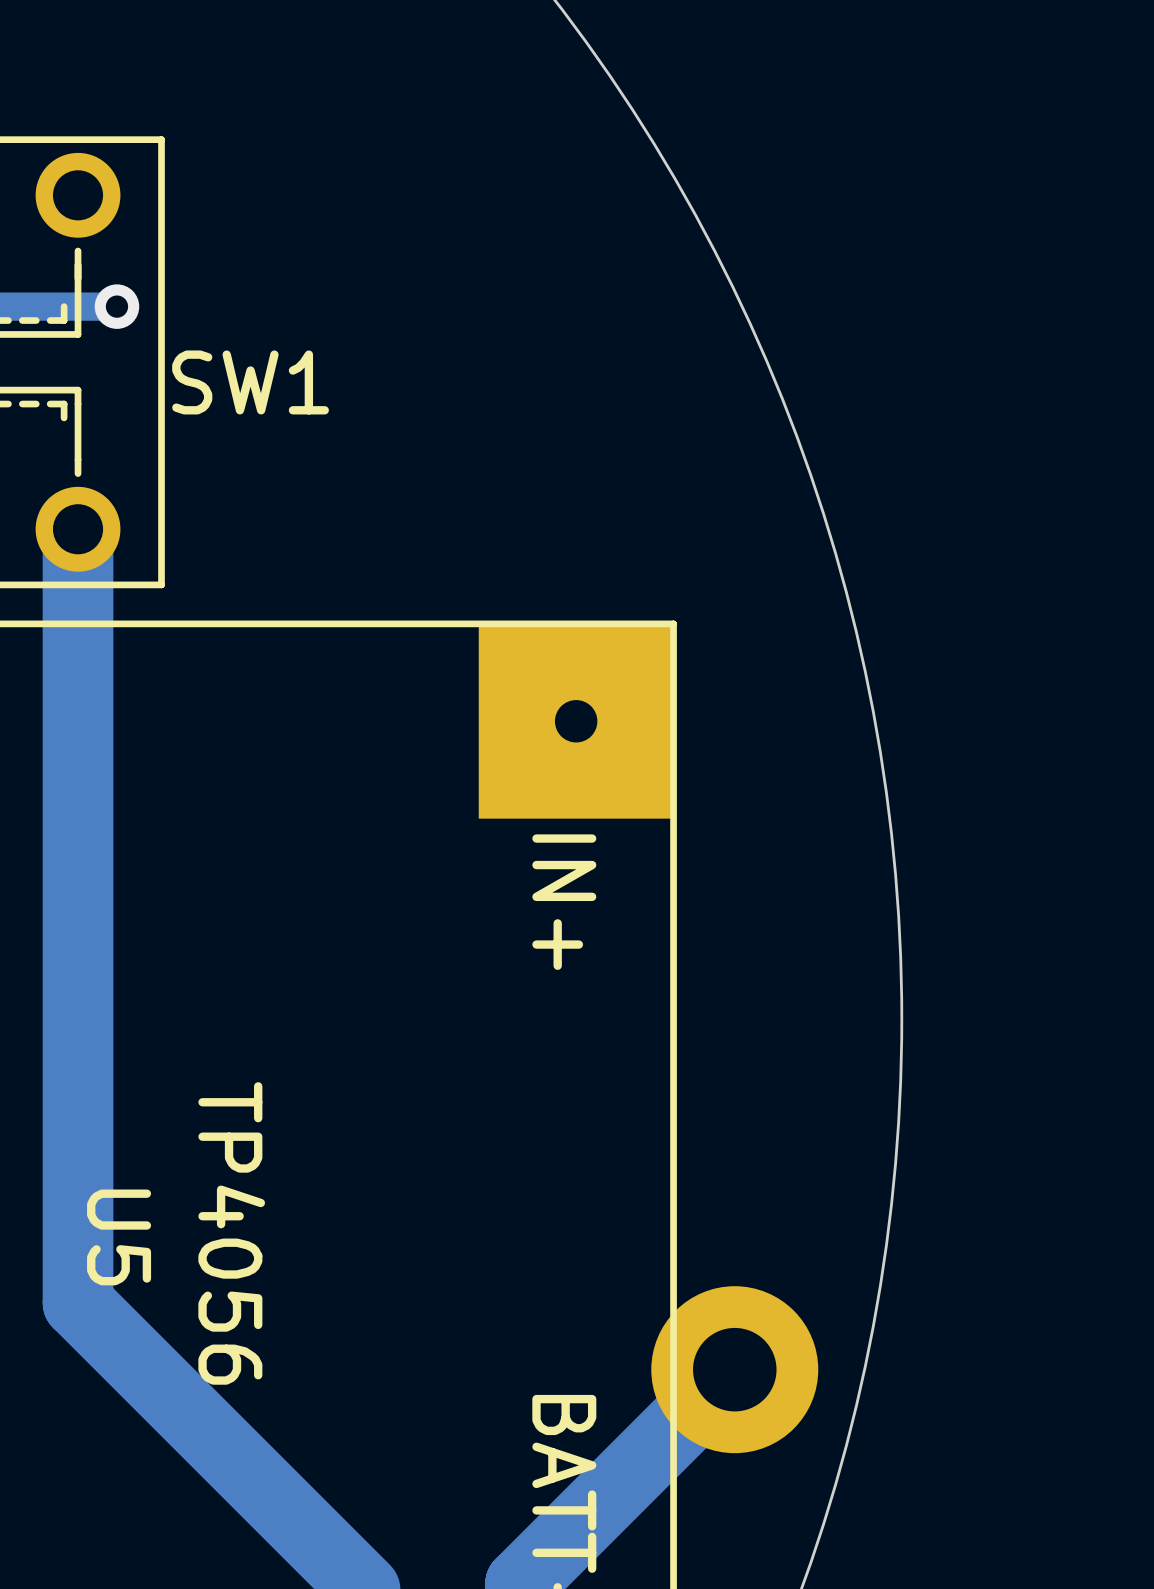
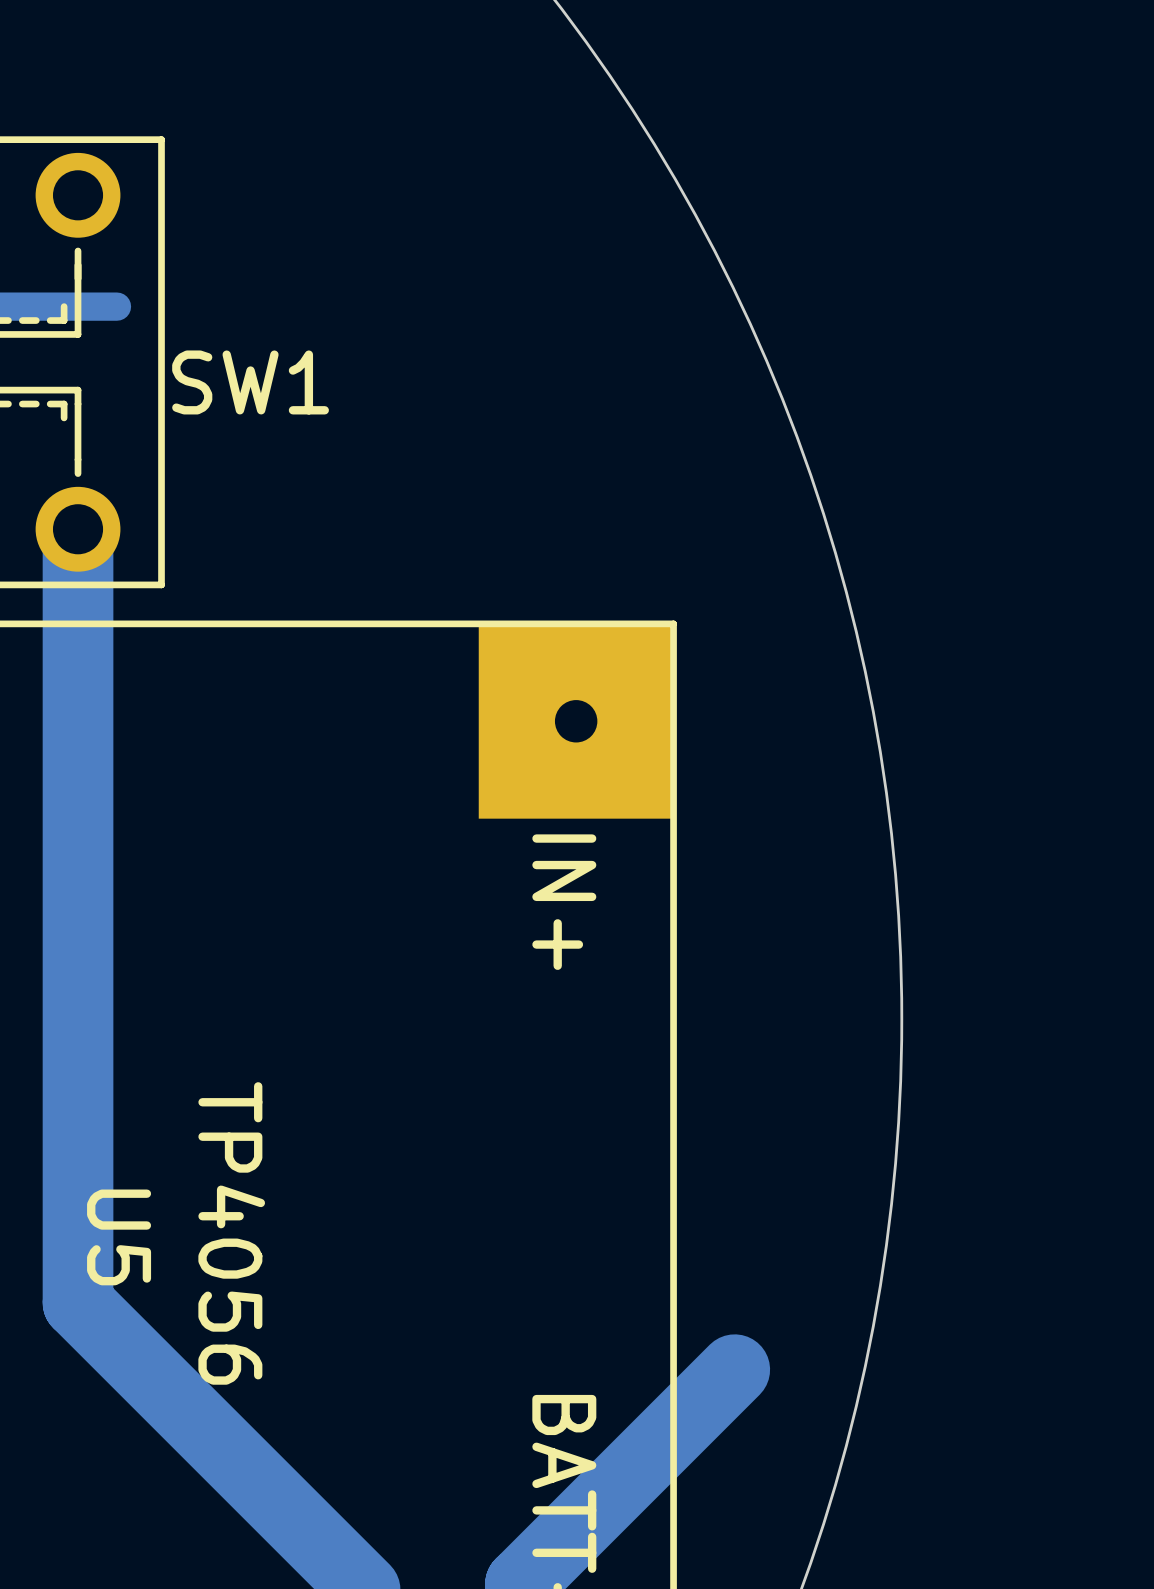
via: (116, 306) -> none
part: (734, 1369) -> none

